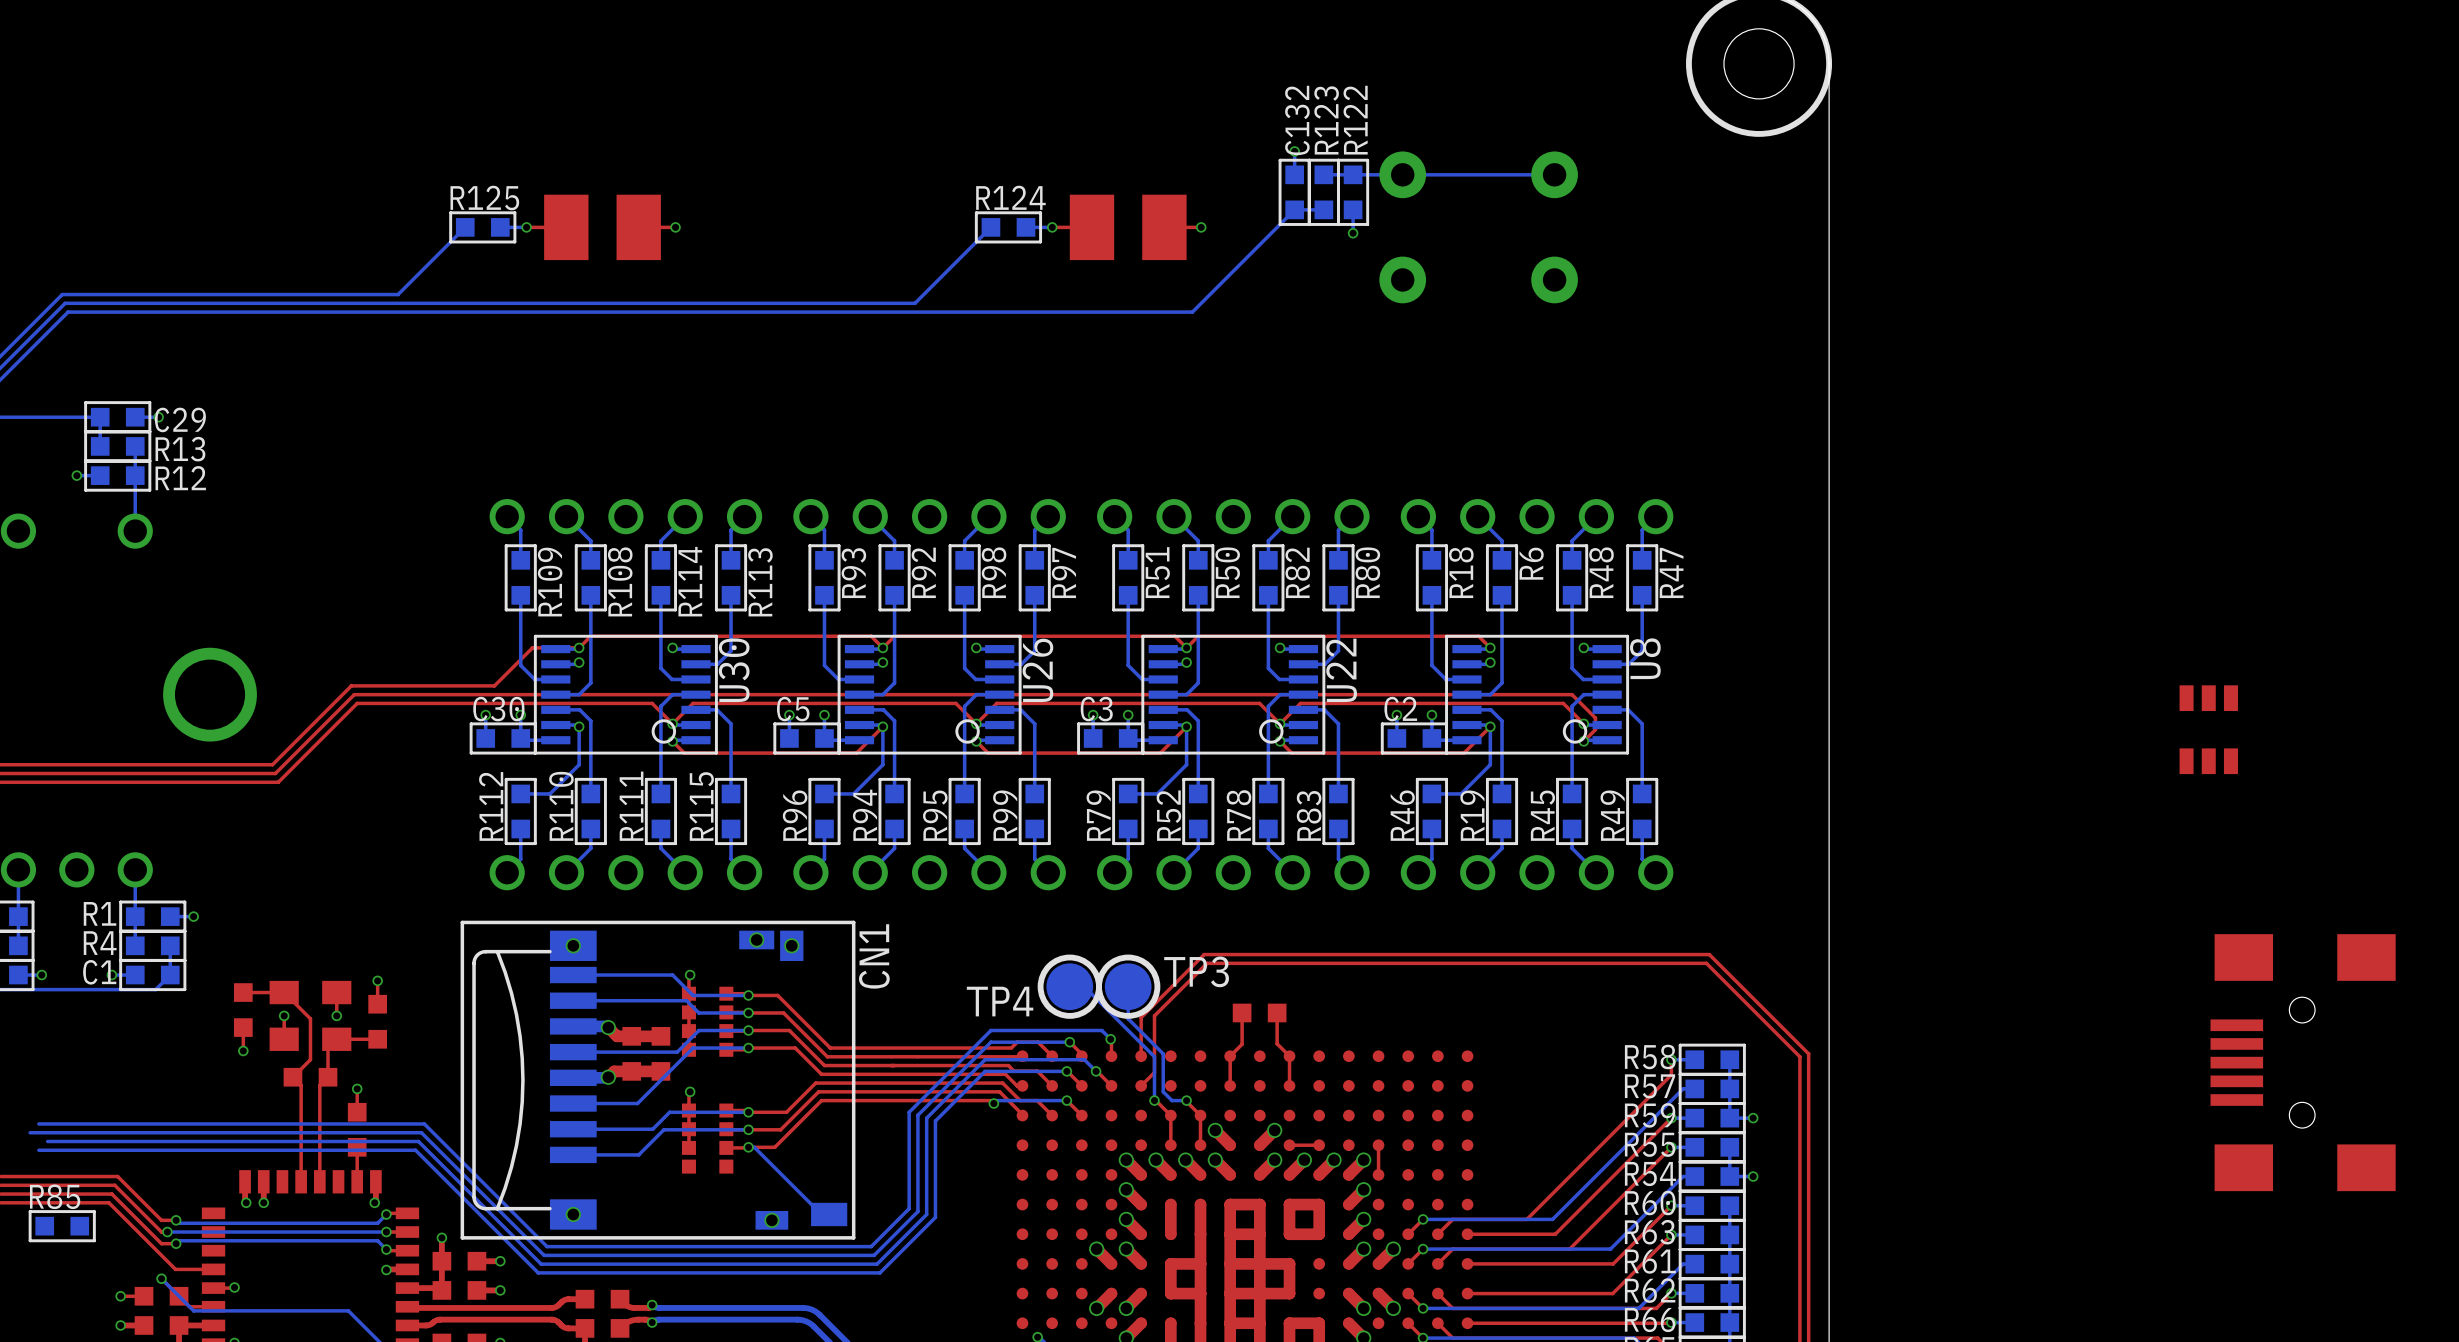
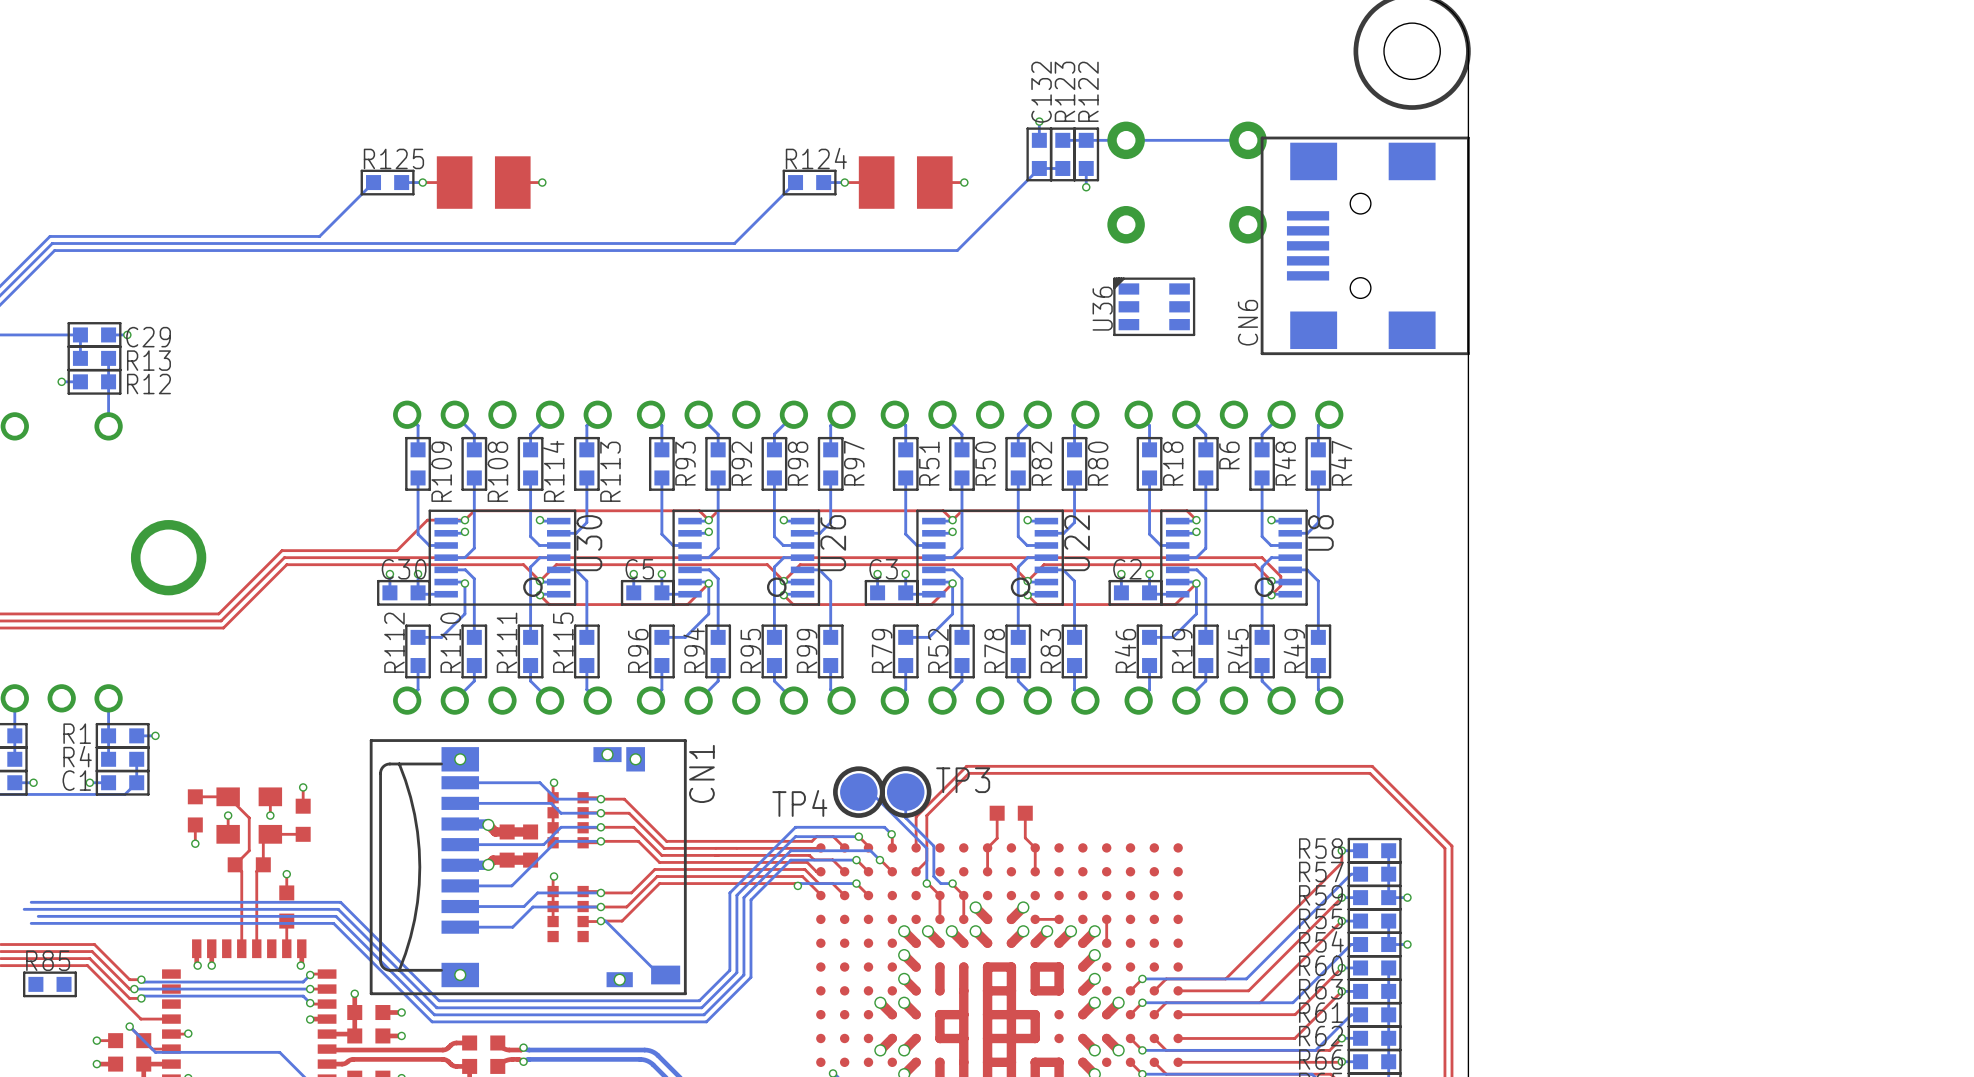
CN6: none -> (1365, 245)
U36: none -> (1154, 306)
part: (2208, 729) -> none
part: (2303, 1062) -> none

